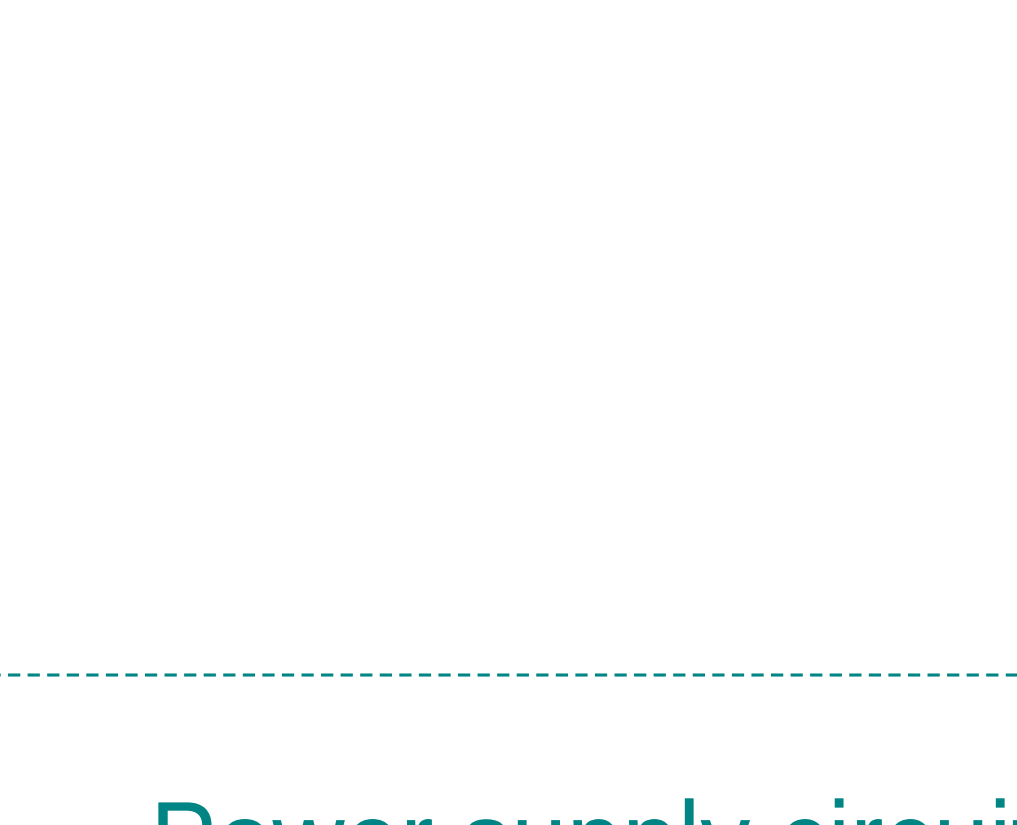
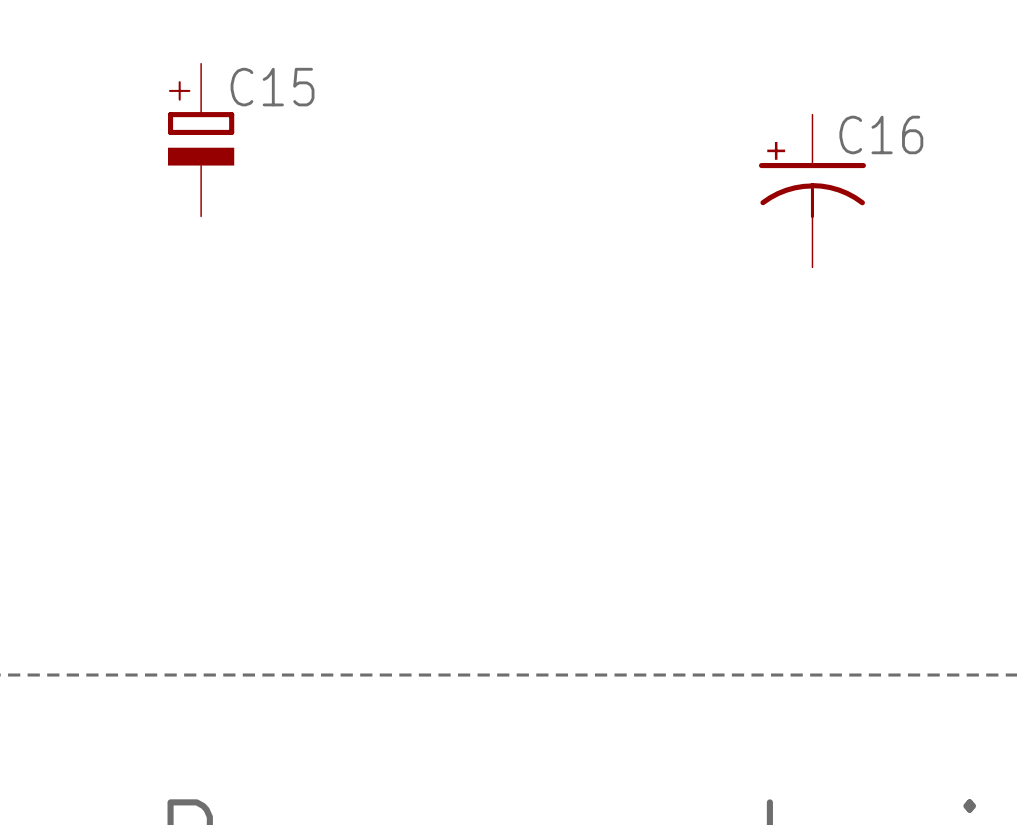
C15: none -> (201, 140)
C16: none -> (812, 191)

